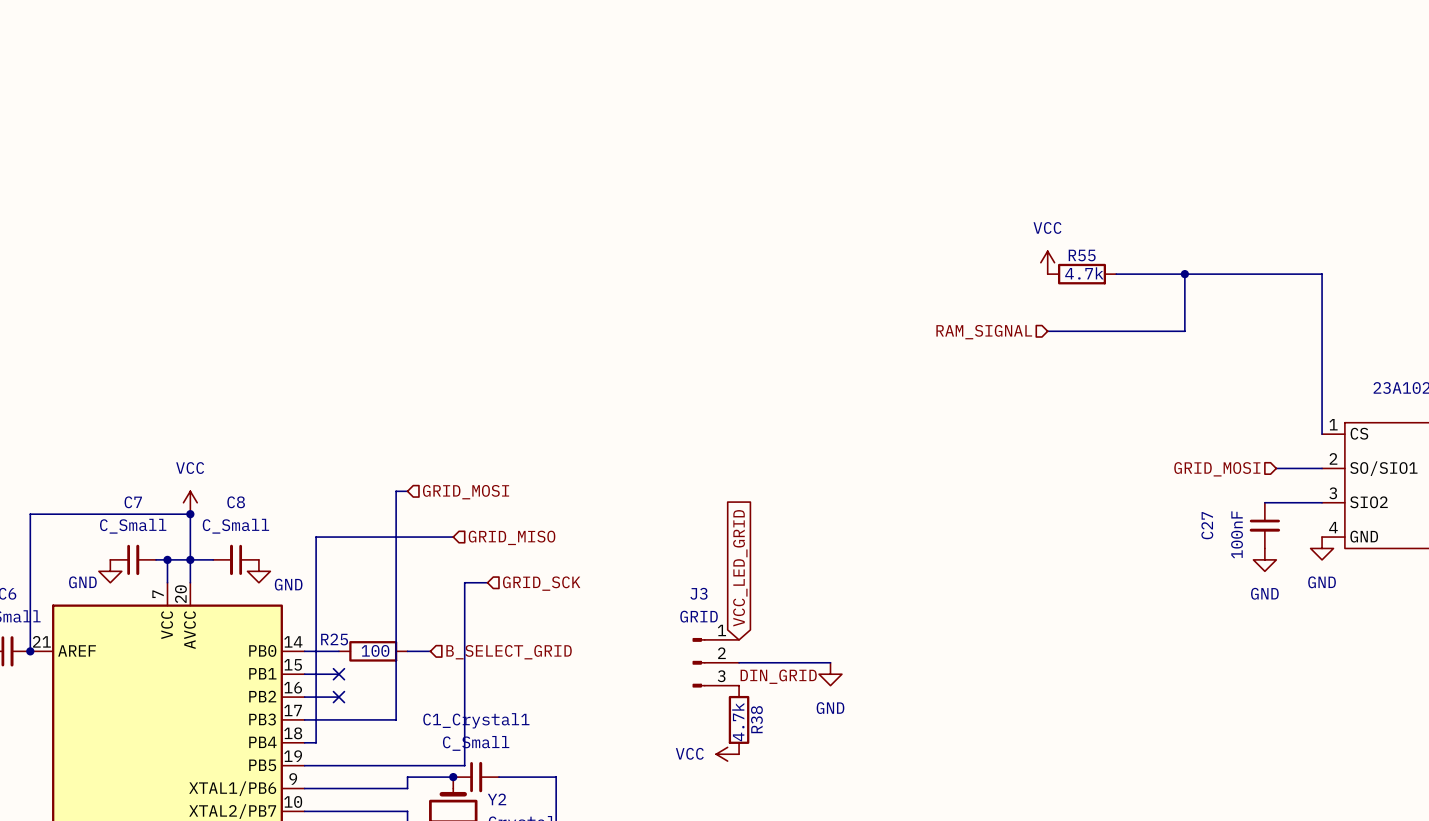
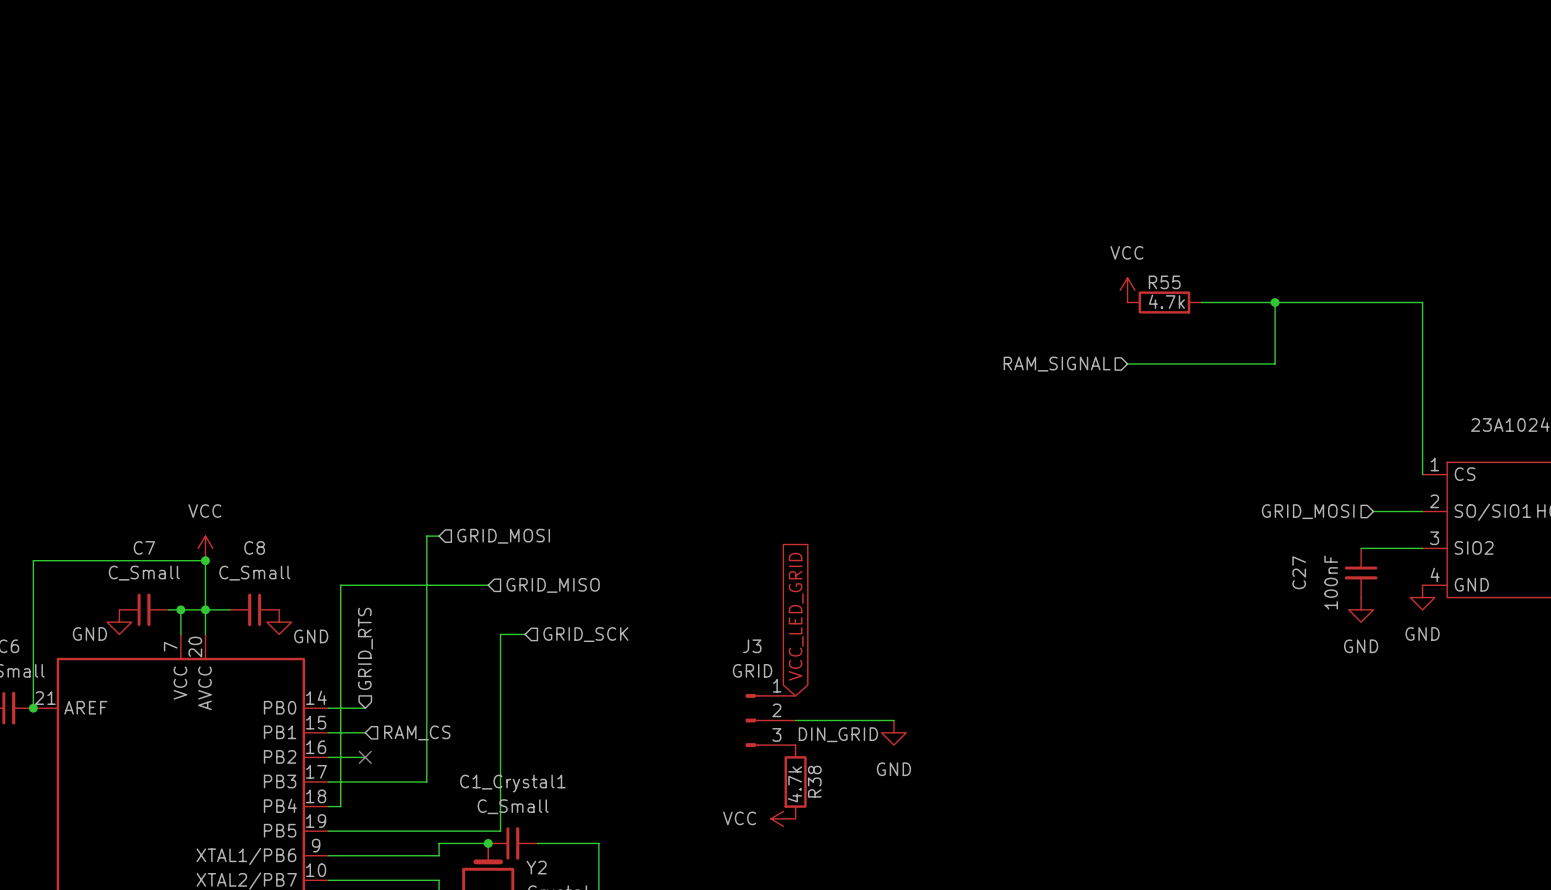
hierarchical label: none -> GRID_RTS (365, 648)
R25: 100 (373, 651) -> none
wire: (407, 651) (430, 651) -> none
hierarchical label: B_SELECT_GRID (509, 652) -> none
no-connect mark: (338, 674) -> none
hierarchical label: none -> RAM_CS (417, 732)

